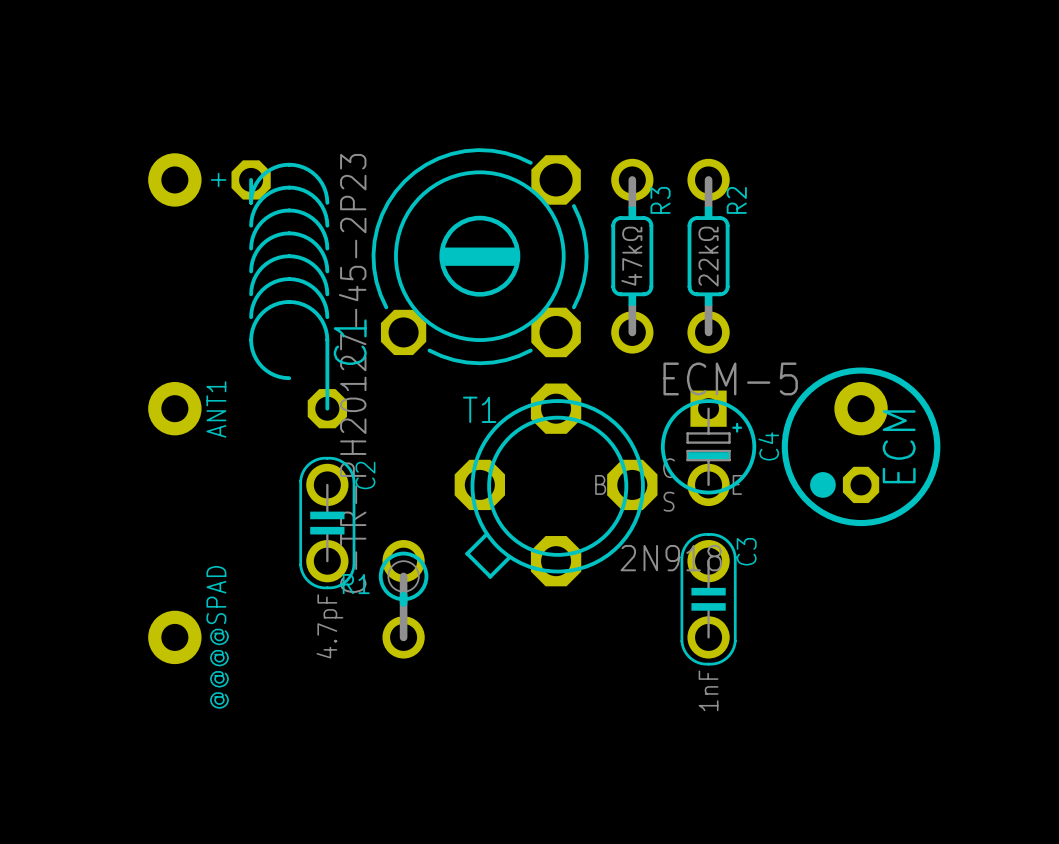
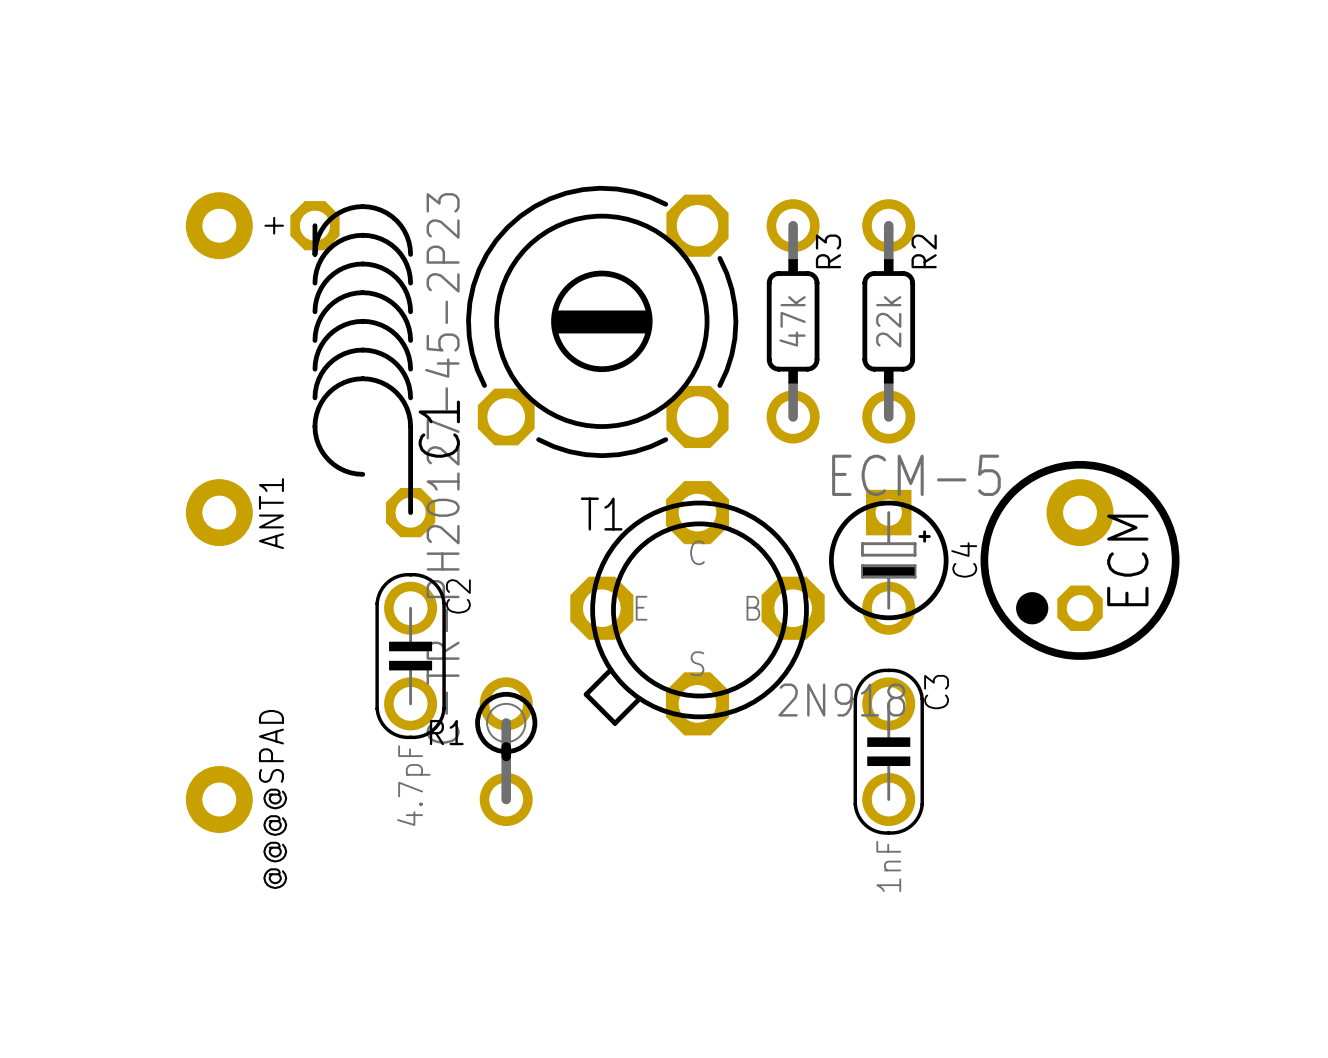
R3 value: 47kΩ (631, 256) -> 47k (792, 321)
R2 value: 22kΩ (708, 256) -> 22k (888, 321)
T1 footprint: [454, 383, 658, 587] -> [570, 481, 825, 736]

